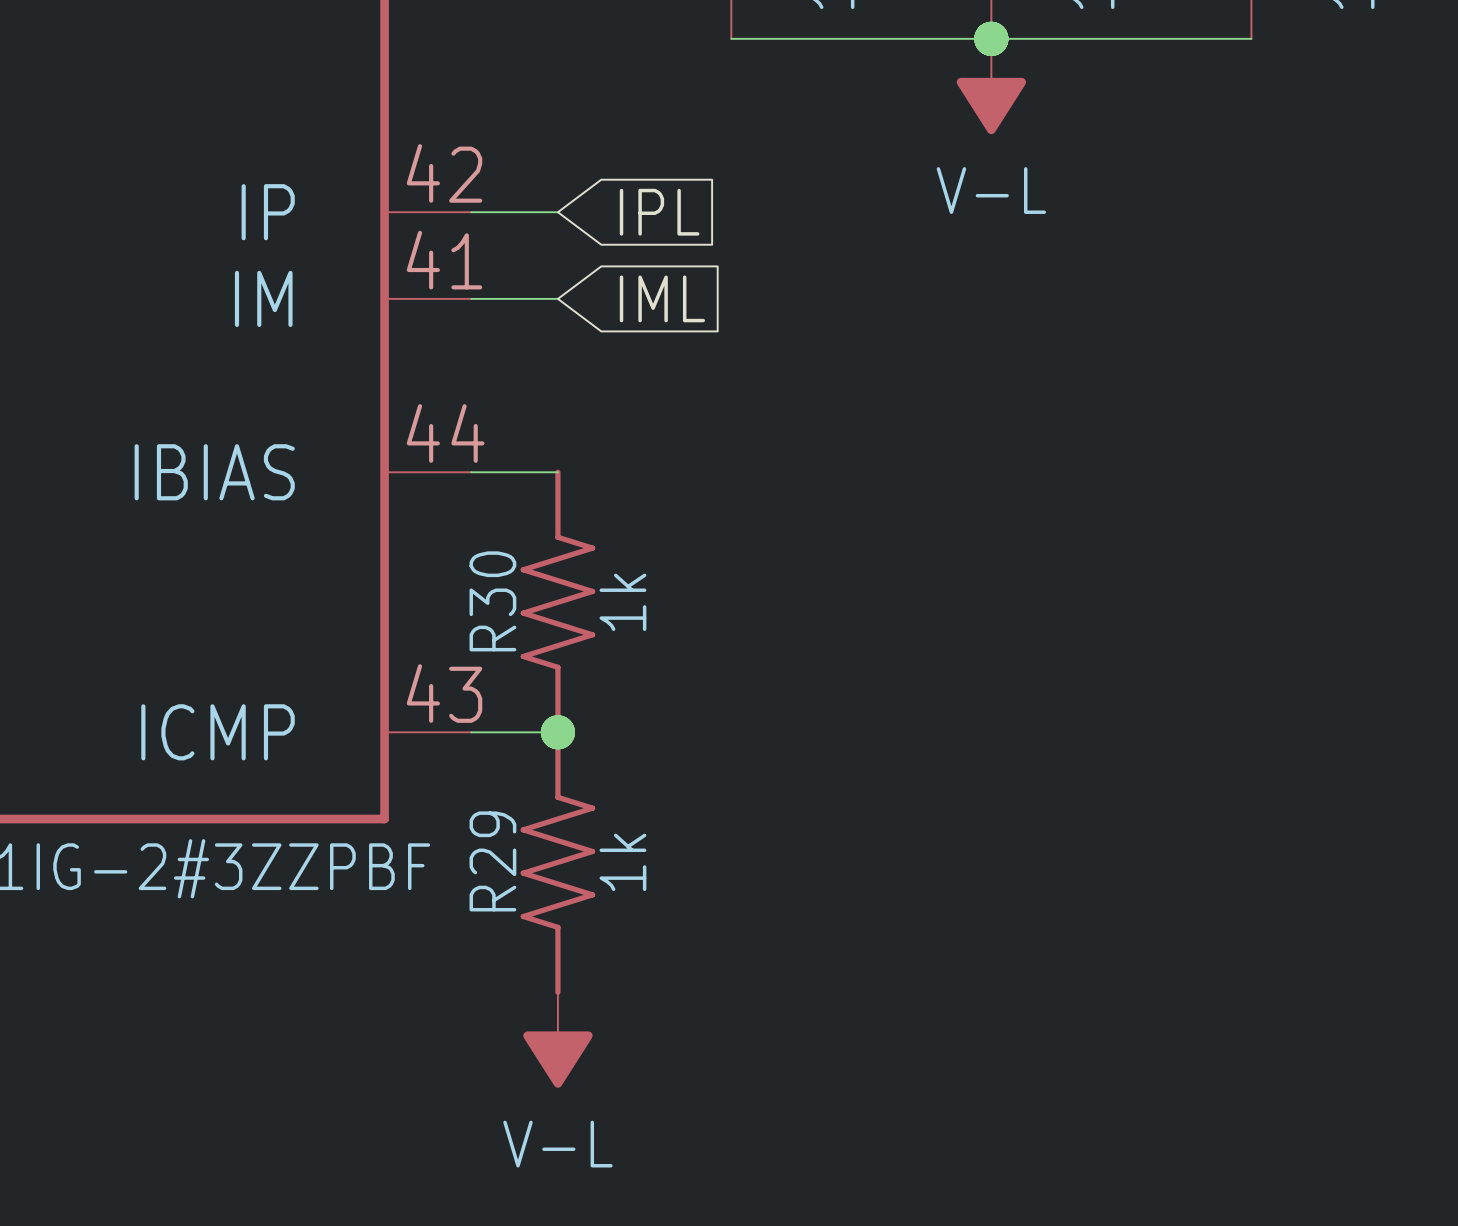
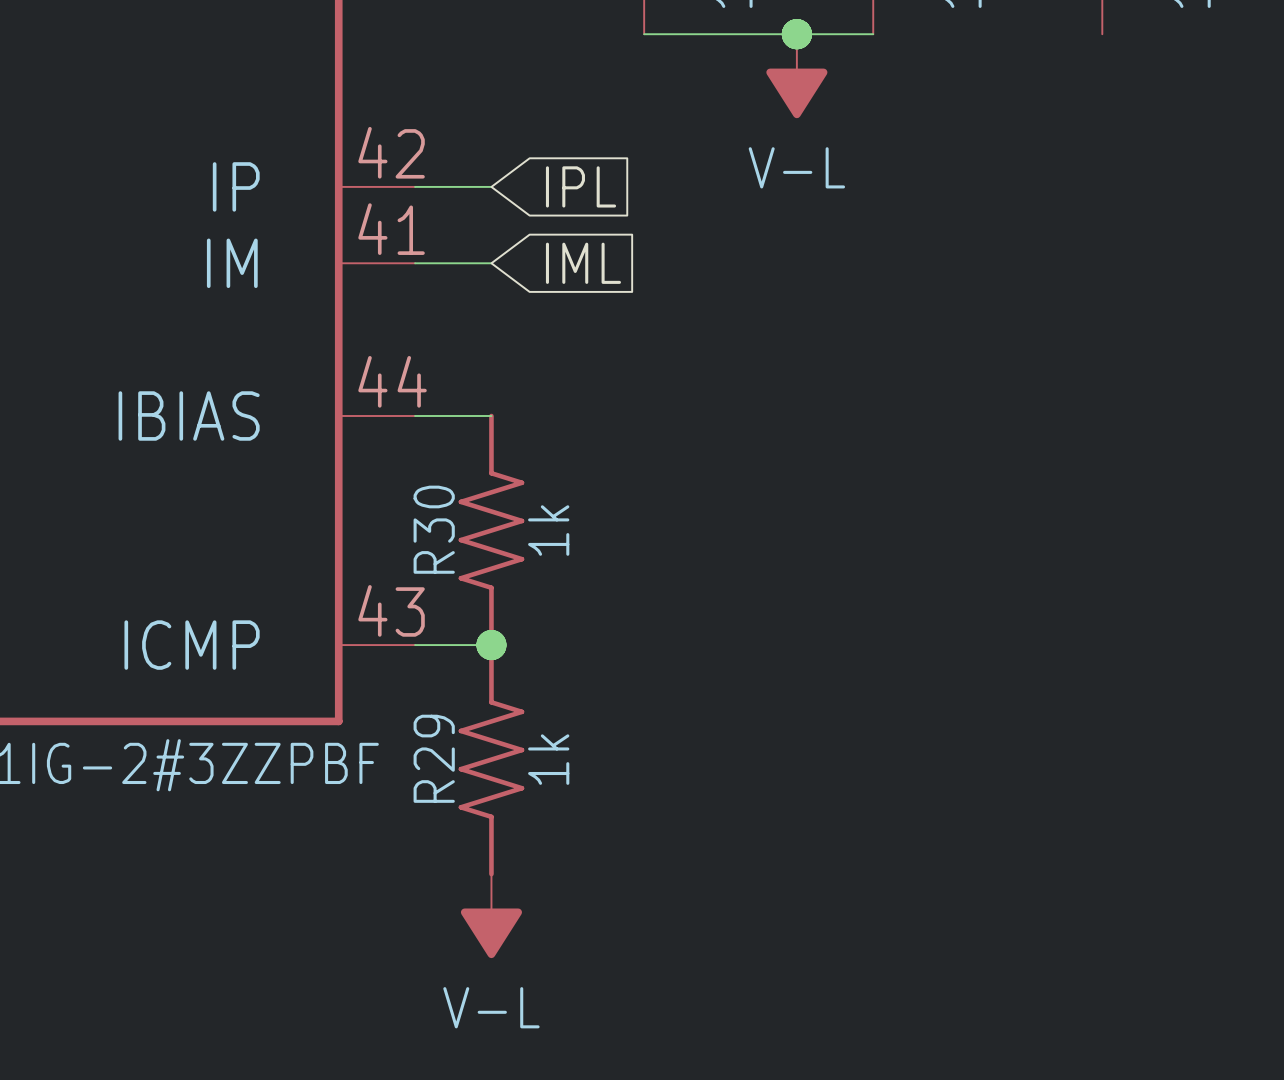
wire: (991, 38) (1251, 38) -> none
junction position: (991, 38) -> (796, 34)
power symbol position: V-L (991, 86) -> V-L (796, 76)

